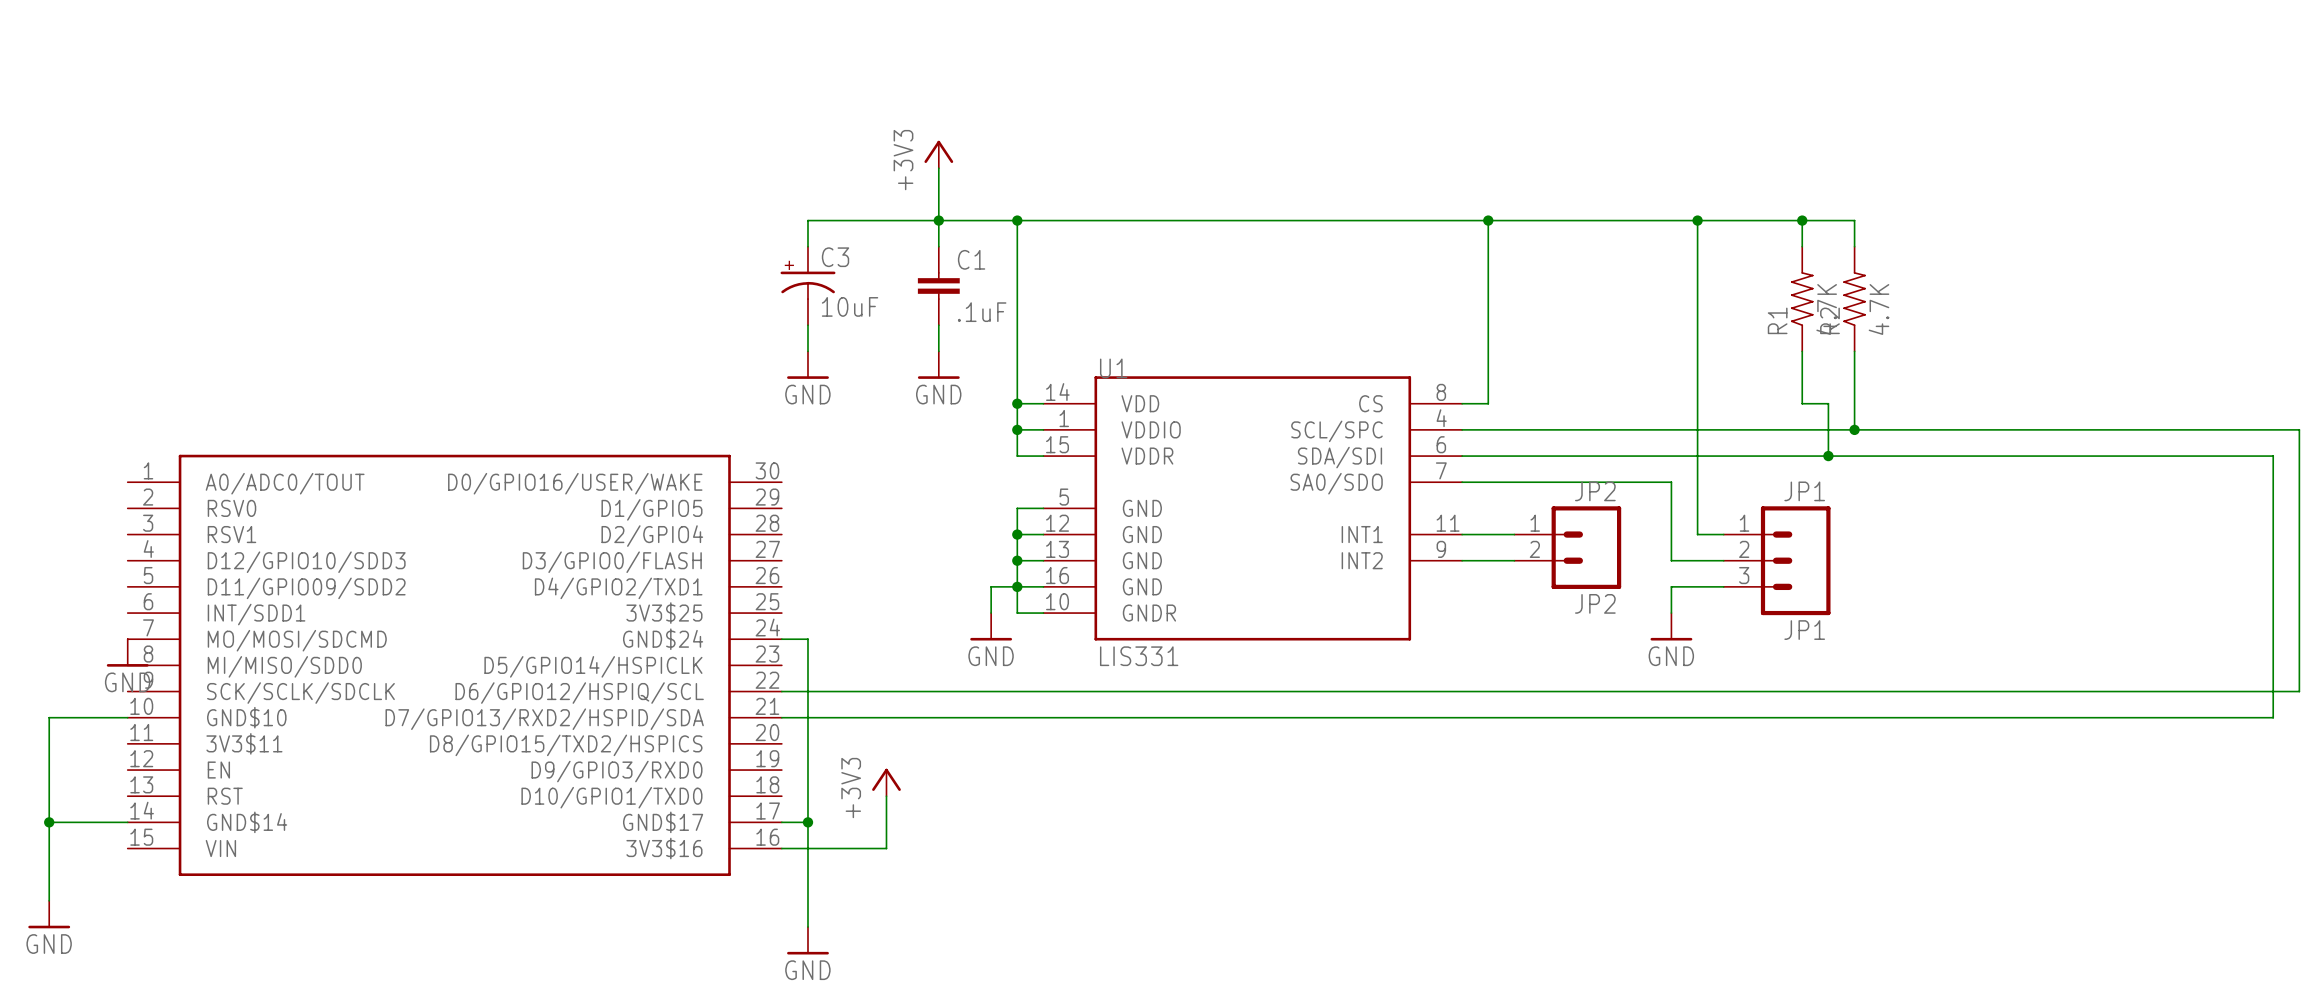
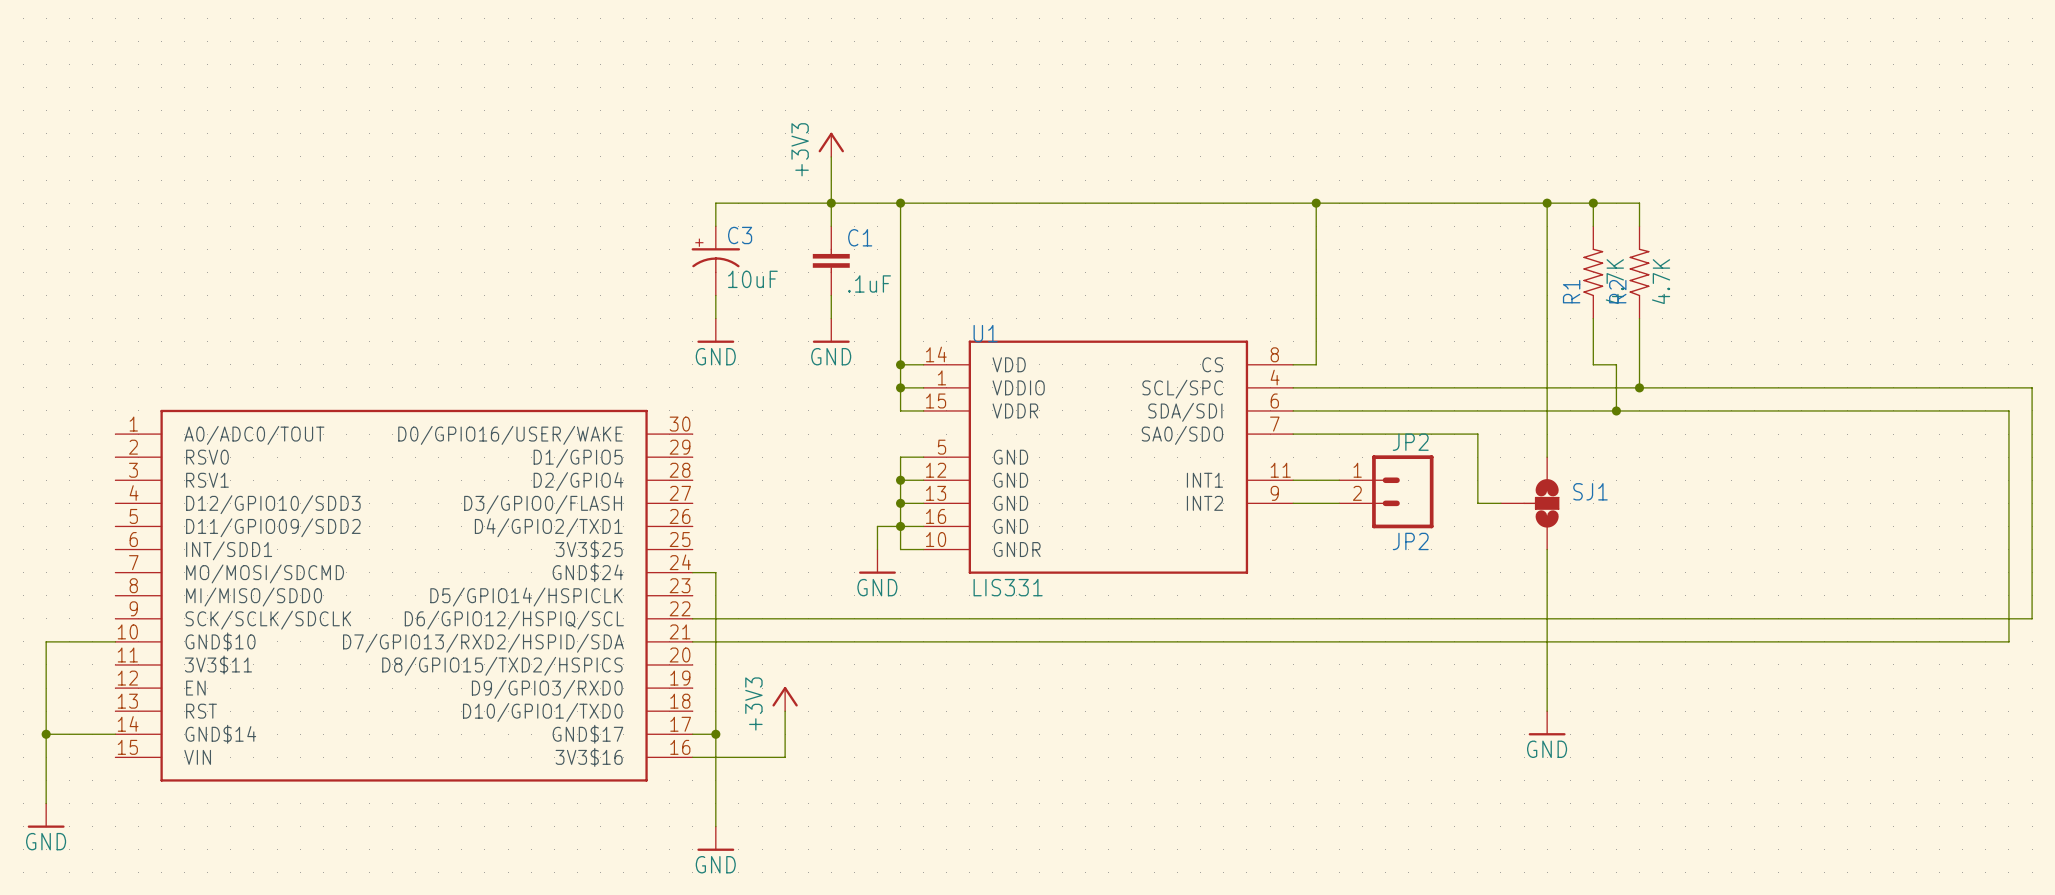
wire: (1697, 220) (1697, 534) (1723, 534) -> none
junction position: (1697, 220) -> (1547, 203)
wire: none -> (1547, 203) (1547, 457)
SJ1: none -> (1530, 503)
JP1: JP1 (1777, 560) -> none
wire: (1723, 586) (1671, 586) (1671, 613) -> none
wire: none -> (1547, 549) (1547, 711)
power symbol position: GND (1671, 626) -> GND (1547, 723)
power symbol: GND (127, 652) -> none

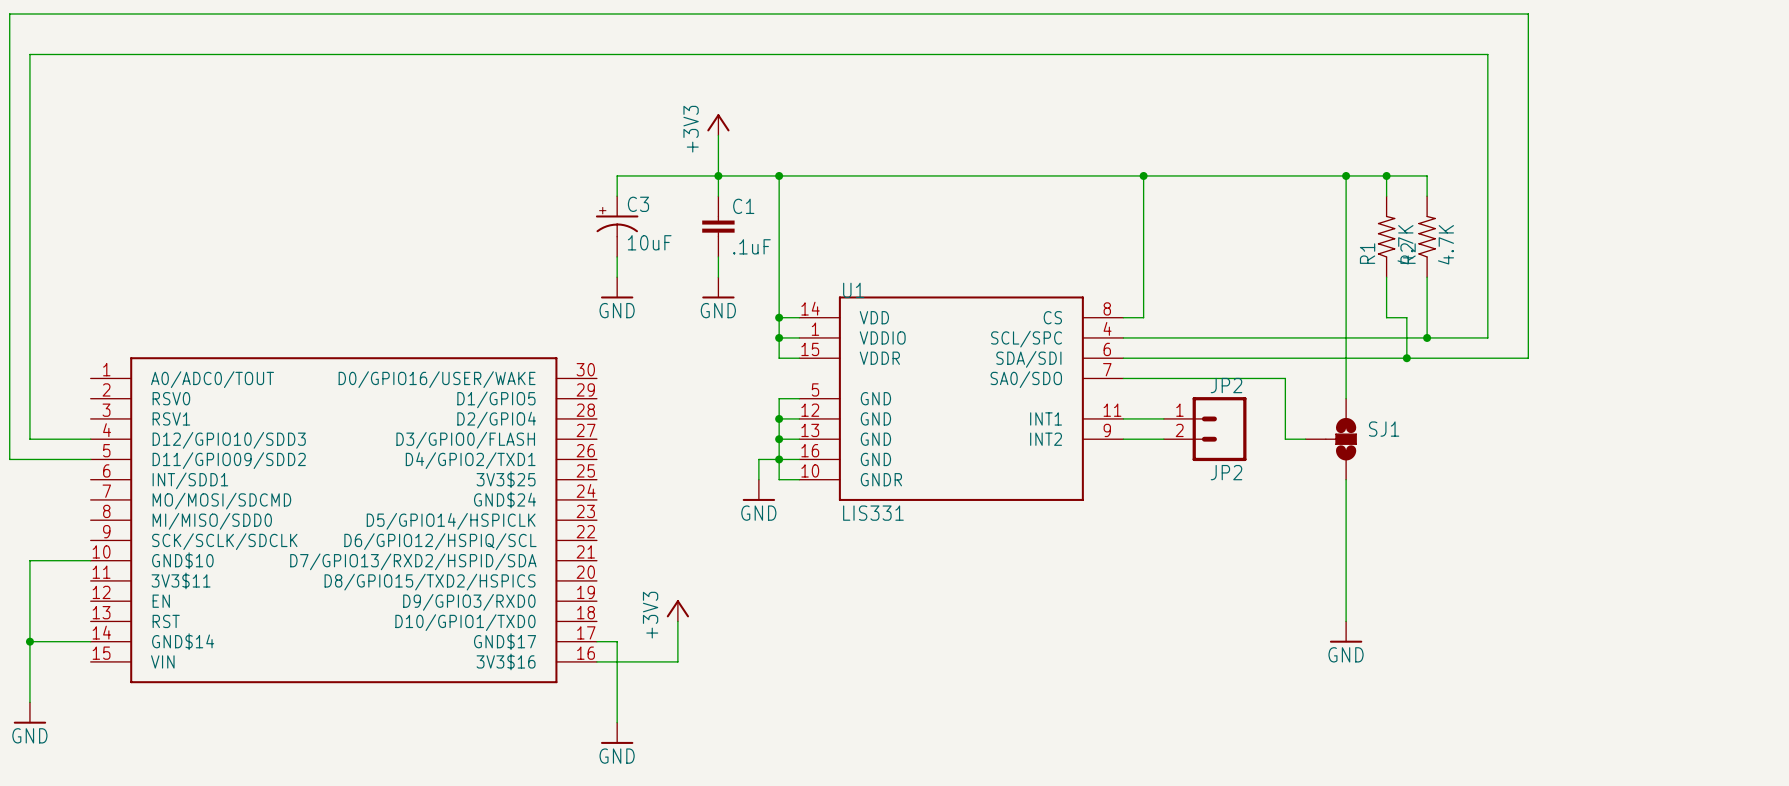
wire: (1708, 387) (2032, 387) (2032, 618) (692, 618) -> (1487, 337) (1487, 54) (29, 54) (29, 439) (90, 439)
wire: (1754, 410) (2008, 410) (2008, 641) (692, 641) -> (1528, 358) (1528, 13) (9, 13) (9, 459) (90, 459)
wire: (692, 572) (715, 572) (715, 734) -> none
junction: (715, 734) -> none

